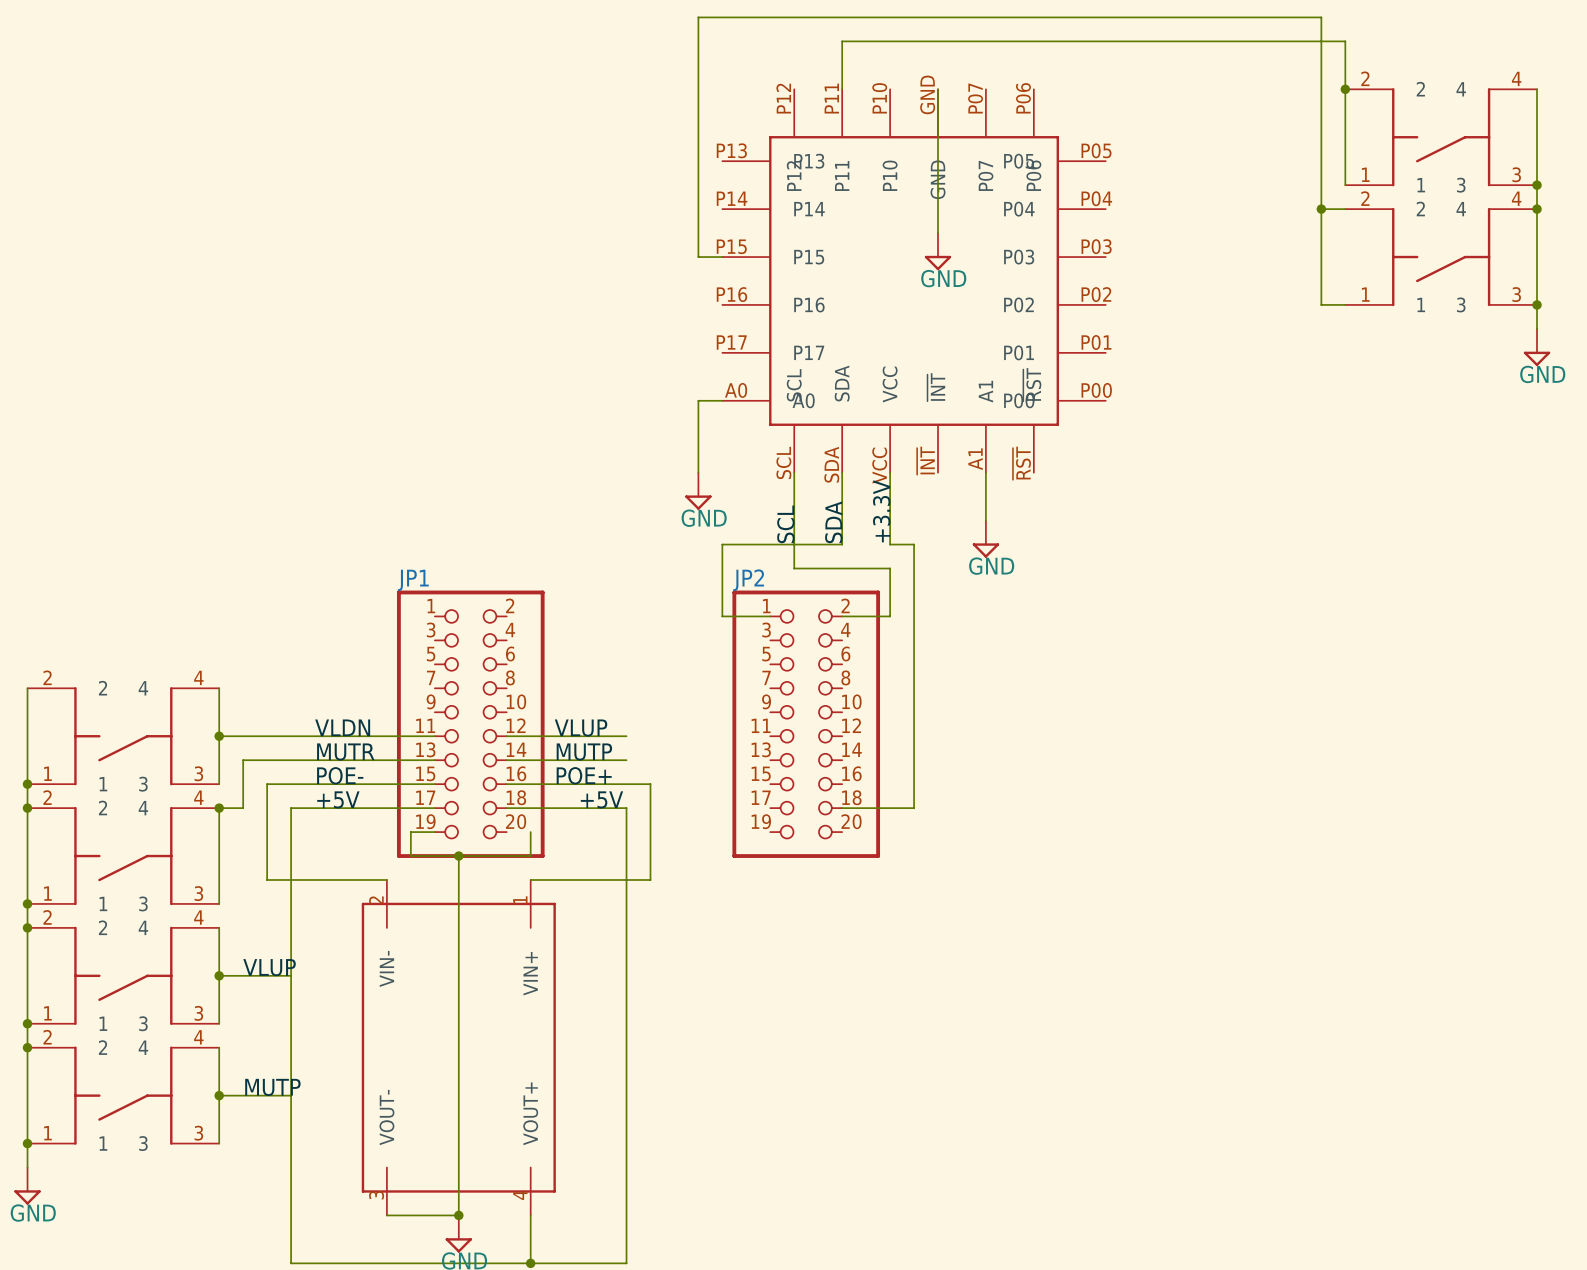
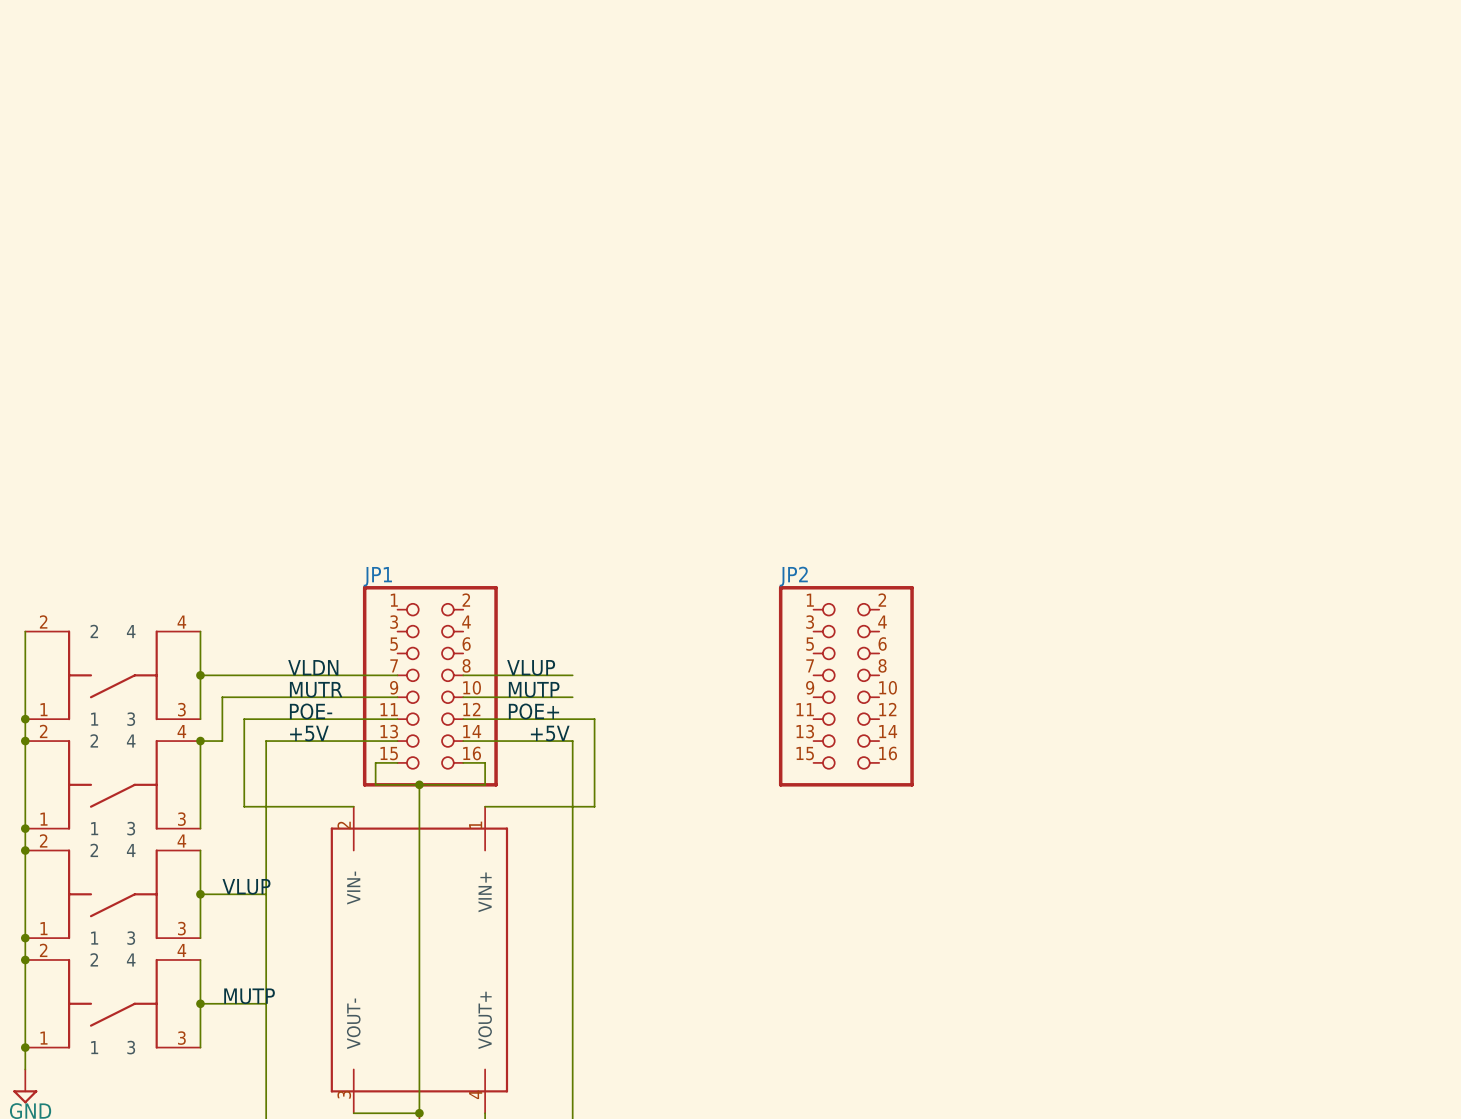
wire: (842, 89) (842, 41) (1345, 41) (1345, 185) -> none
wire: (938, 89) (938, 233) -> none
junction: (1345, 89) -> none
wire: (1537, 89) (1537, 328) -> none
part: (1441, 137) -> none
junction: (1537, 185) -> none
wire: (1321, 209) (1345, 209) -> none
junction: (1321, 209) -> none
junction: (1537, 209) -> none
power symbol: GND (938, 251) -> none
wire: (722, 257) (698, 257) (698, 17) (1321, 17) (1321, 304) (1345, 304) -> none
part: (1441, 257) -> none
part: (914, 280) -> none
junction: (1537, 304) -> none
power symbol: GND (1537, 347) -> none
wire: (722, 400) (698, 400) (698, 472) -> none
wire: (794, 472) (794, 568) (890, 568) (890, 616) (842, 616) -> none
wire: (842, 472) (842, 544) (722, 544) (722, 616) (770, 616) -> none
wire: (890, 472) (890, 544) (914, 544) (914, 808) (842, 808) -> none
wire: (985, 472) (985, 520) -> none
power symbol: GND (698, 491) -> none
label: +3.3V (881, 511) -> none
label: SDA (833, 522) -> none
label: SCL (785, 524) -> none
power symbol: GND (985, 539) -> none
JP1 name position: JP1 (413, 580) -> JP1 (377, 576)
JP2 name position: JP2 (748, 580) -> JP2 (793, 576)
JP1 symbol: [396, 590, 545, 858] -> [362, 586, 498, 787]
JP2 symbol: [732, 590, 881, 858] -> [778, 586, 914, 787]
wire: none -> (463, 762) (485, 762)

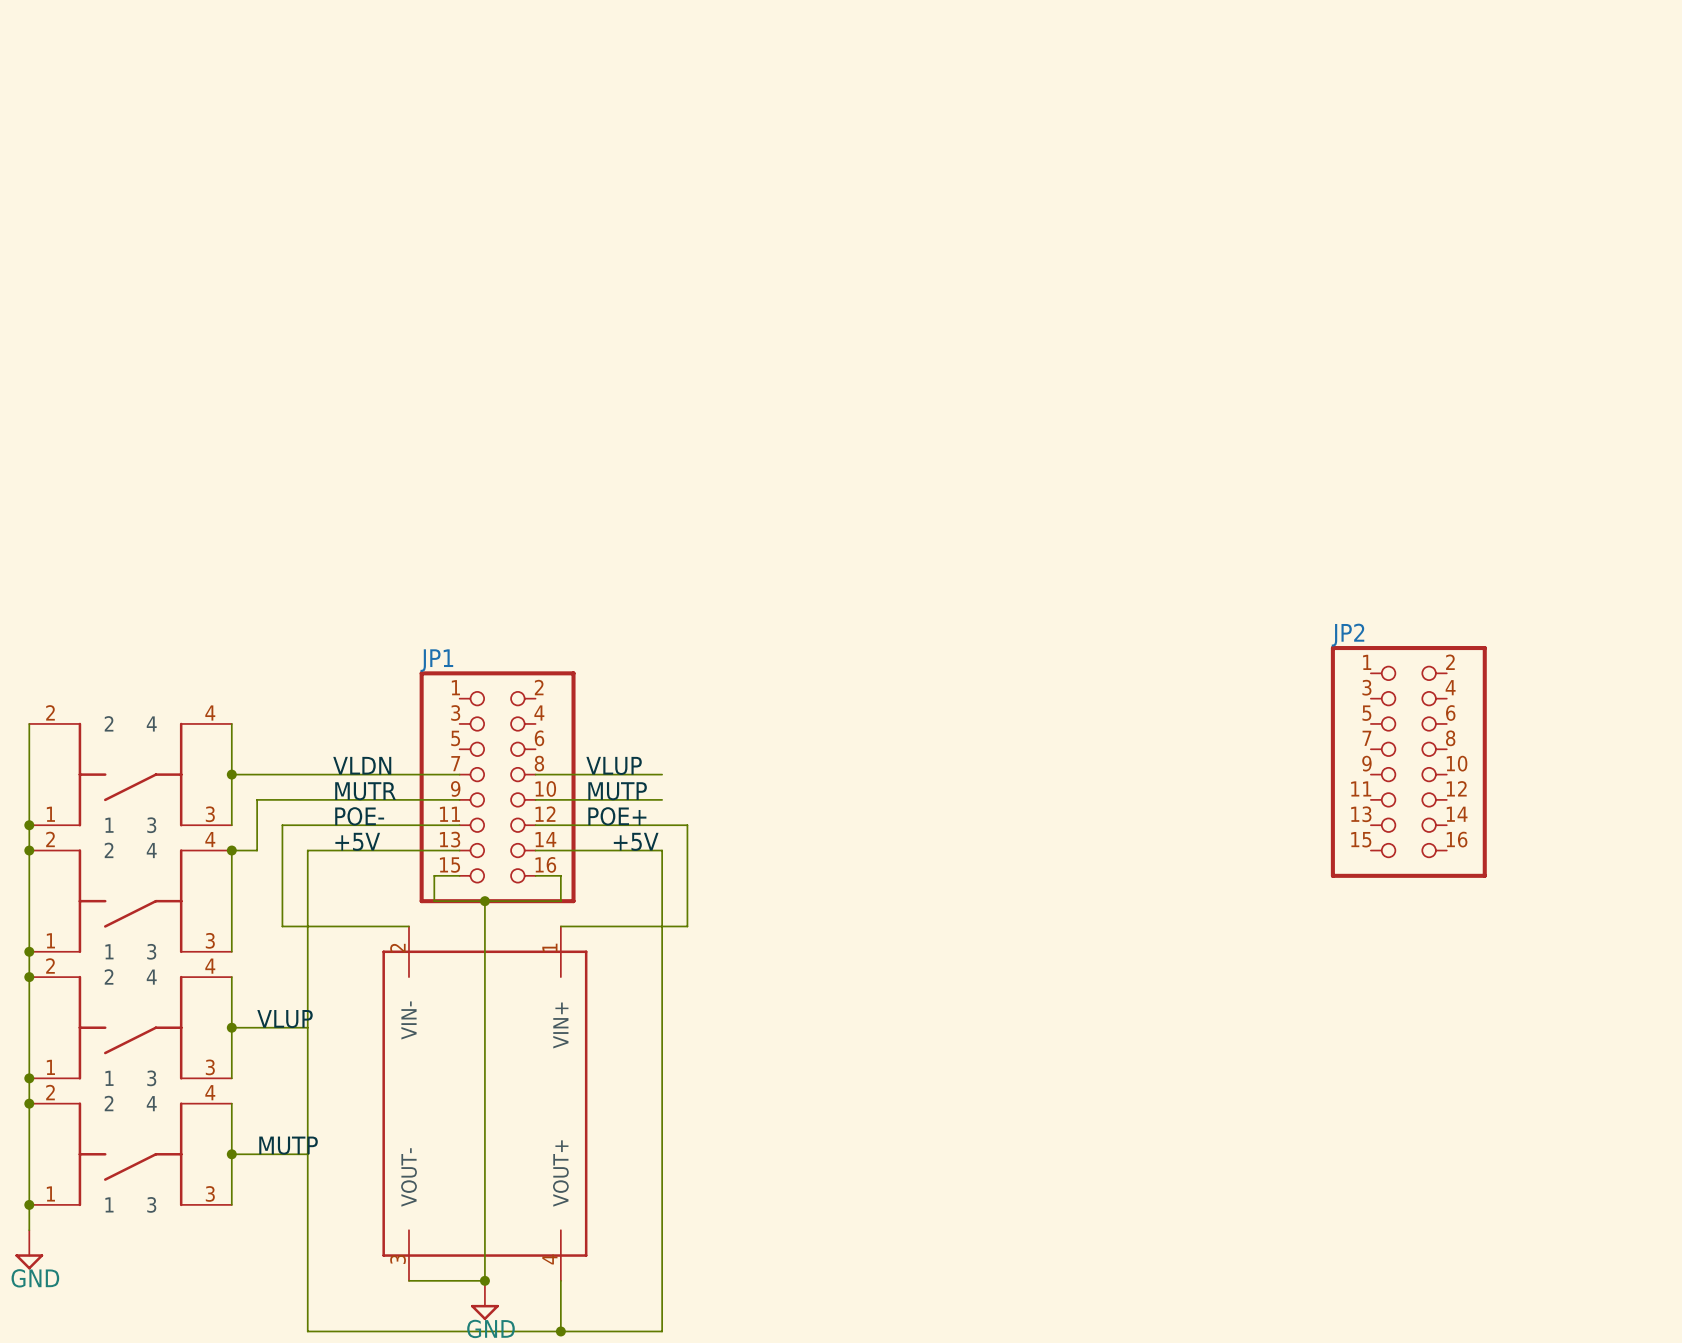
JP2 position: (846, 686) -> (1408, 761)

